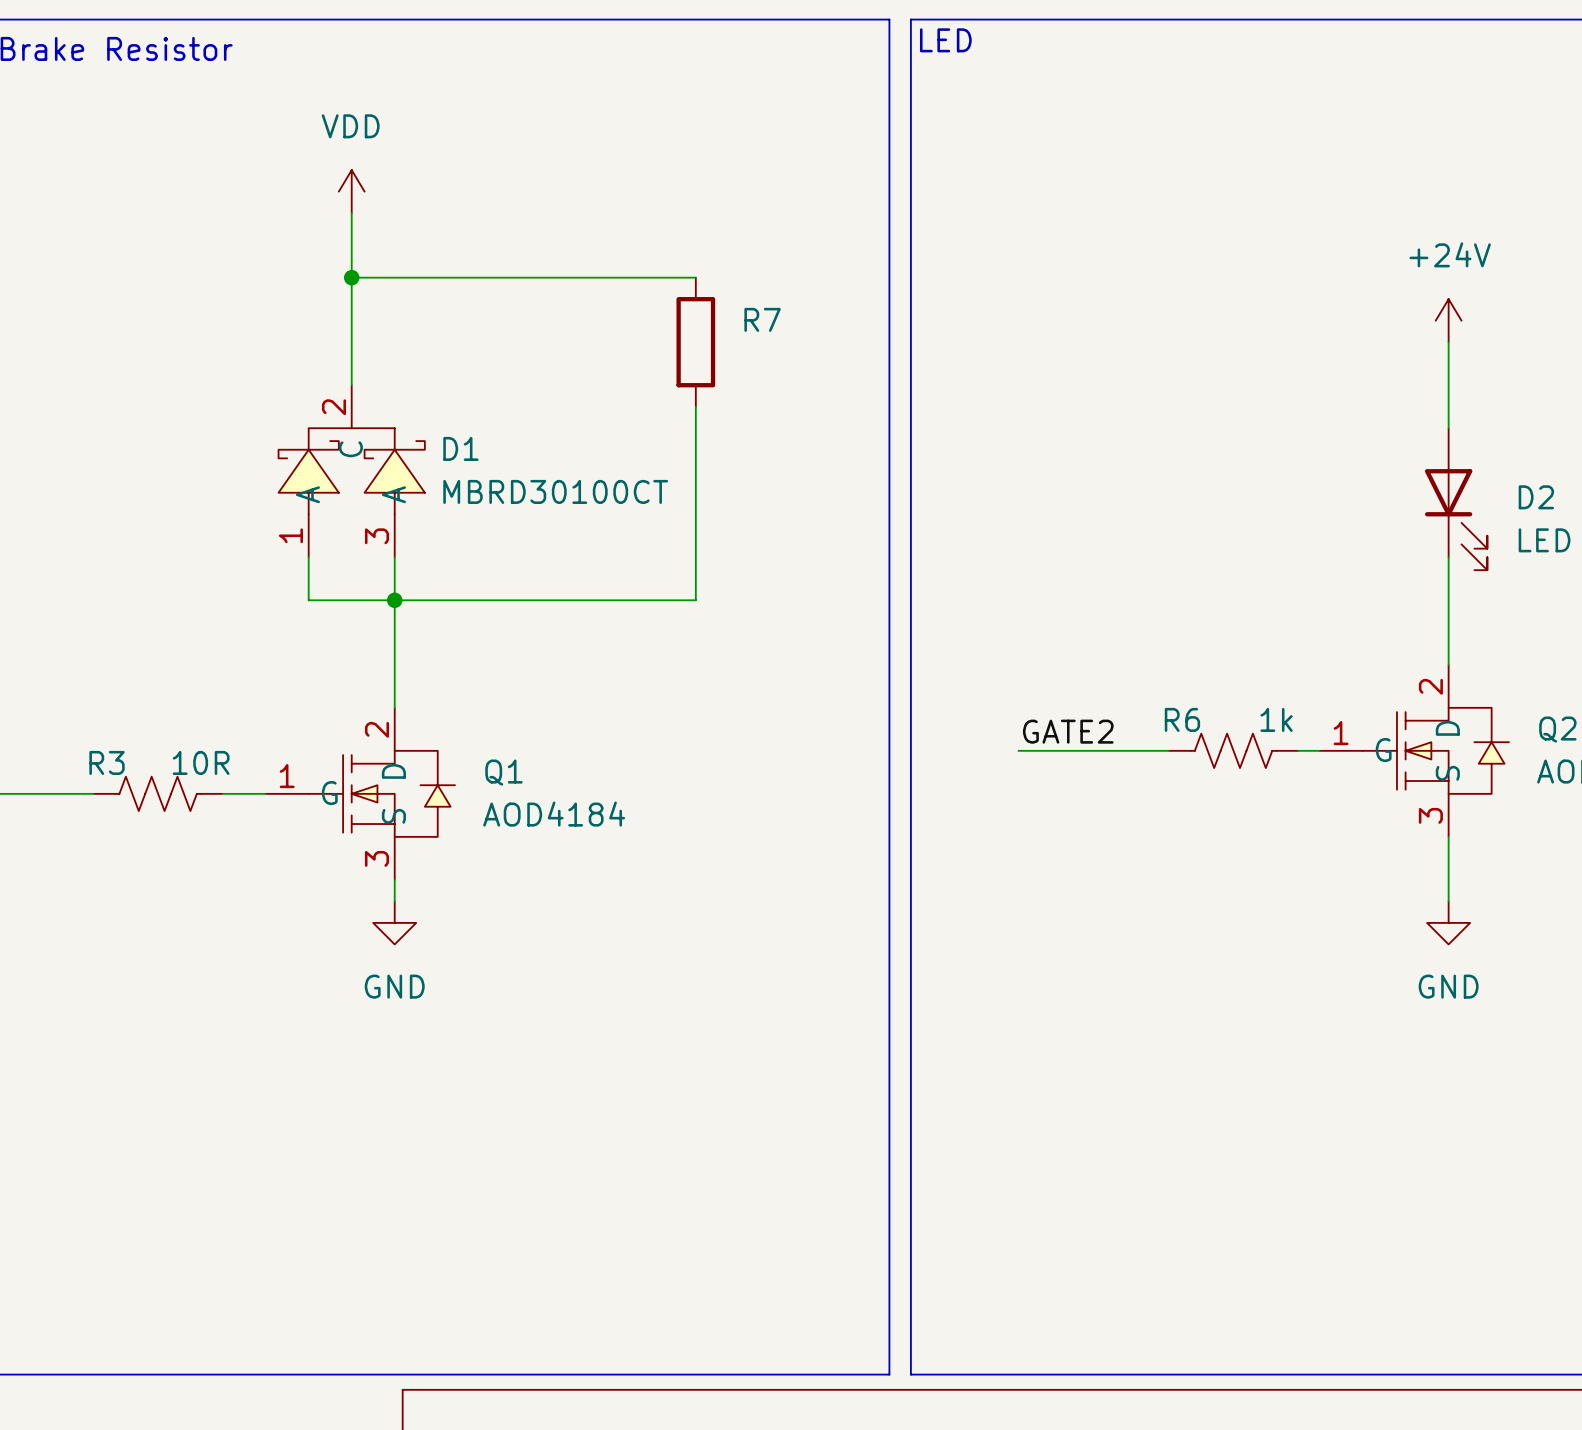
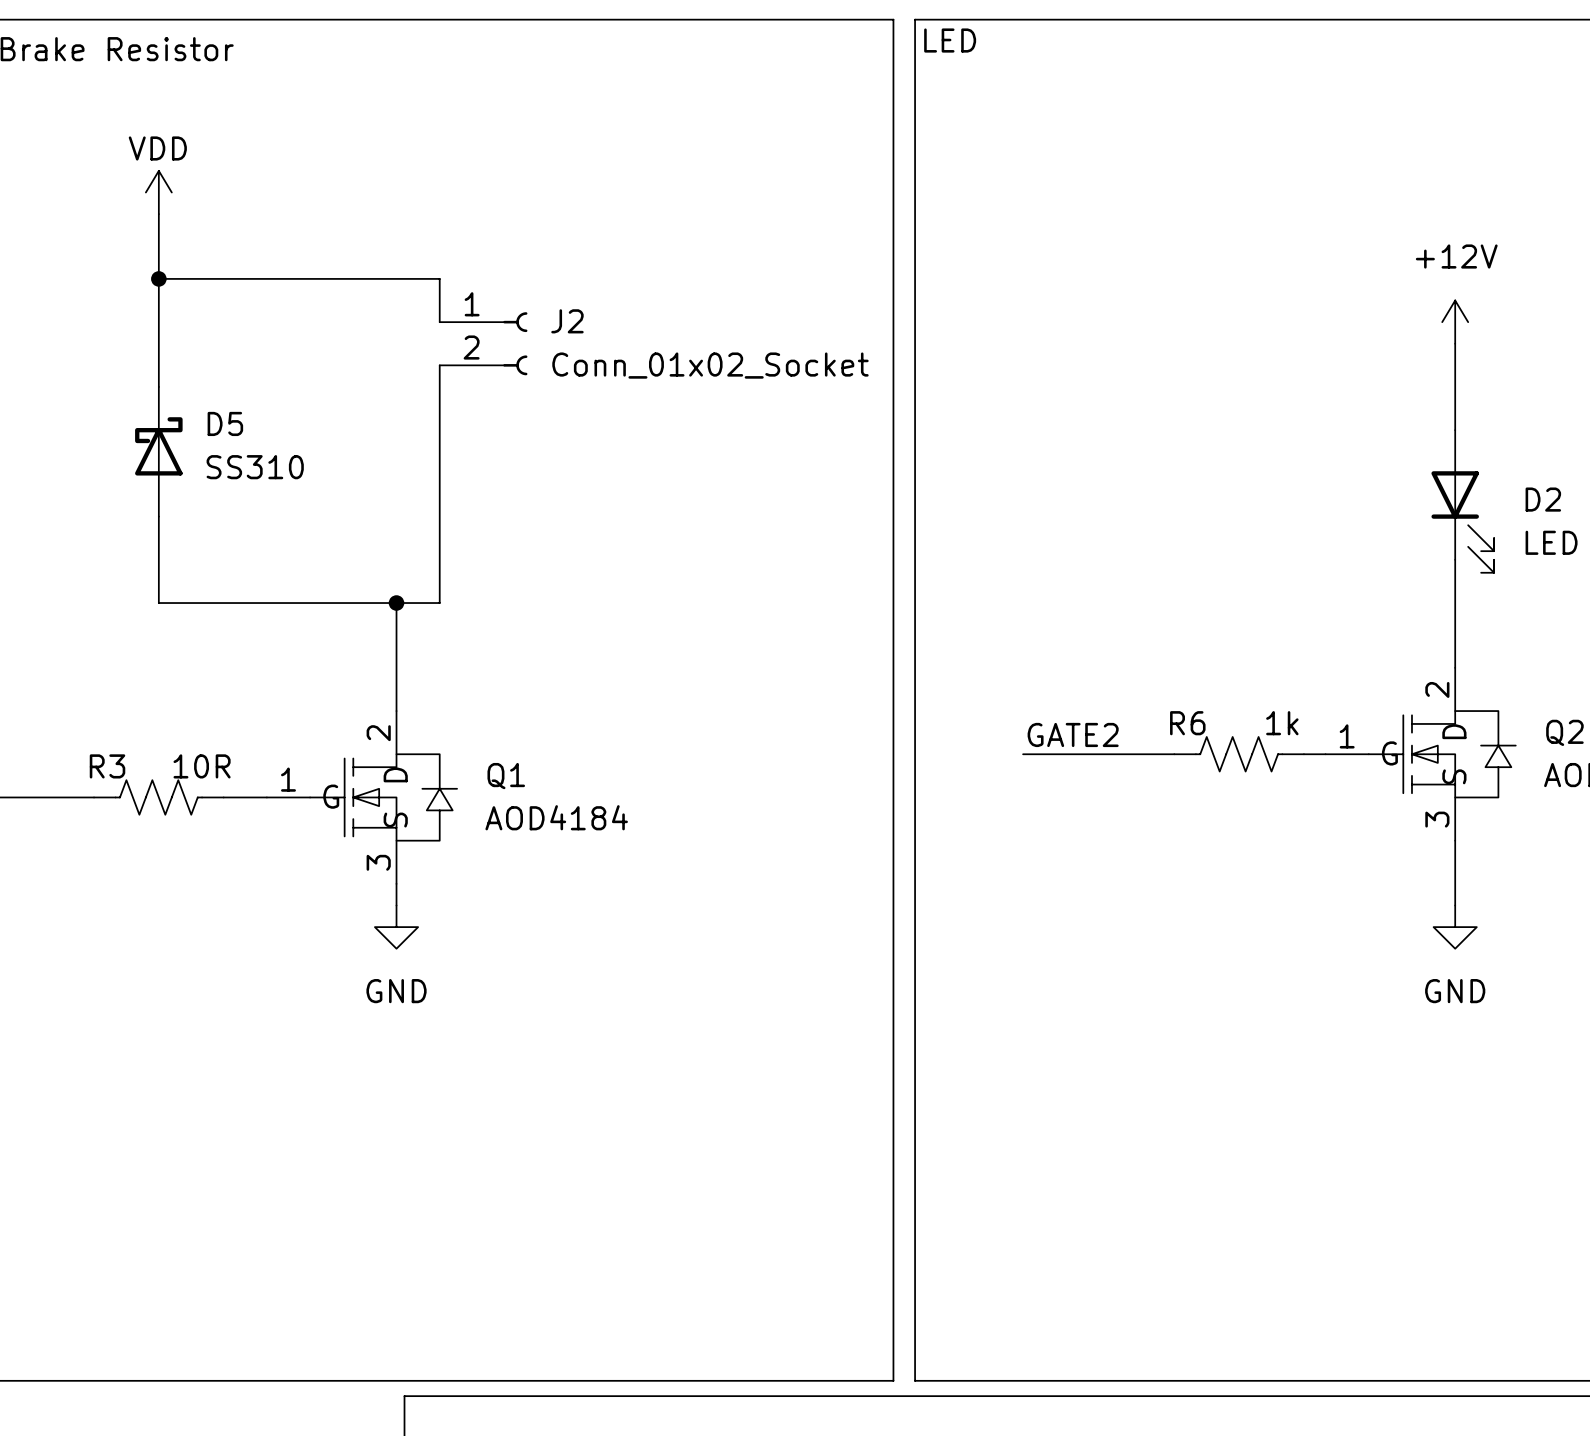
power symbol text position: VDD (350, 126) -> VDD (157, 148)
power symbol position: VDD (351, 191) -> VDD (158, 192)
wire: (351, 213) (351, 385) -> (158, 214) (158, 386)
wire: none -> (158, 278) (353, 278)
junction: none -> (158, 278)
junction: (351, 277) -> none
wire: (437, 277) (695, 277) -> (439, 278) (439, 322)
power symbol: +24V (1448, 320) -> +12V (1455, 322)
J2: none -> Conn_01x02_Socket (483, 343)
R7: (695, 342) -> none
wire: (695, 406) (695, 600) (437, 600) -> (439, 365) (439, 603)
D5: none -> SS310 (158, 451)
D1: MBRD30100CT (351, 471) -> none
wire: (308, 557) (308, 600) -> (158, 516) (158, 603) (310, 603)
wire: (394, 557) (394, 600) -> none

